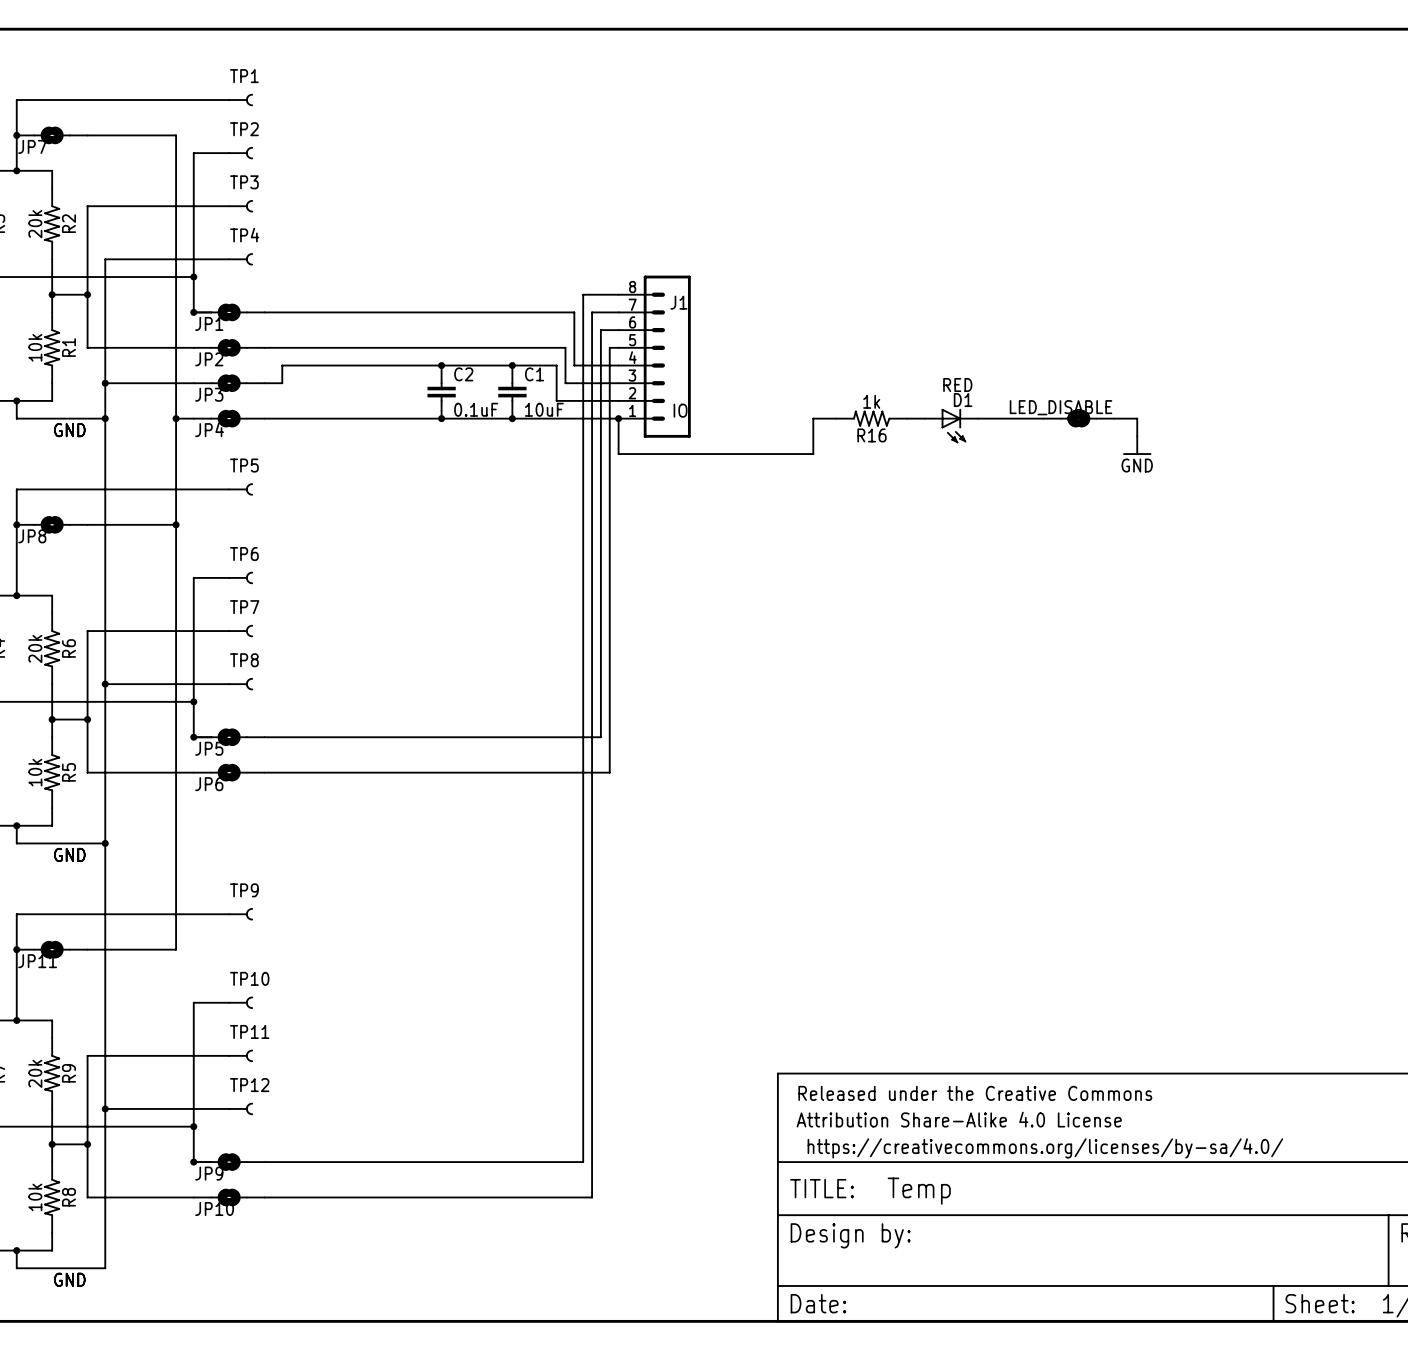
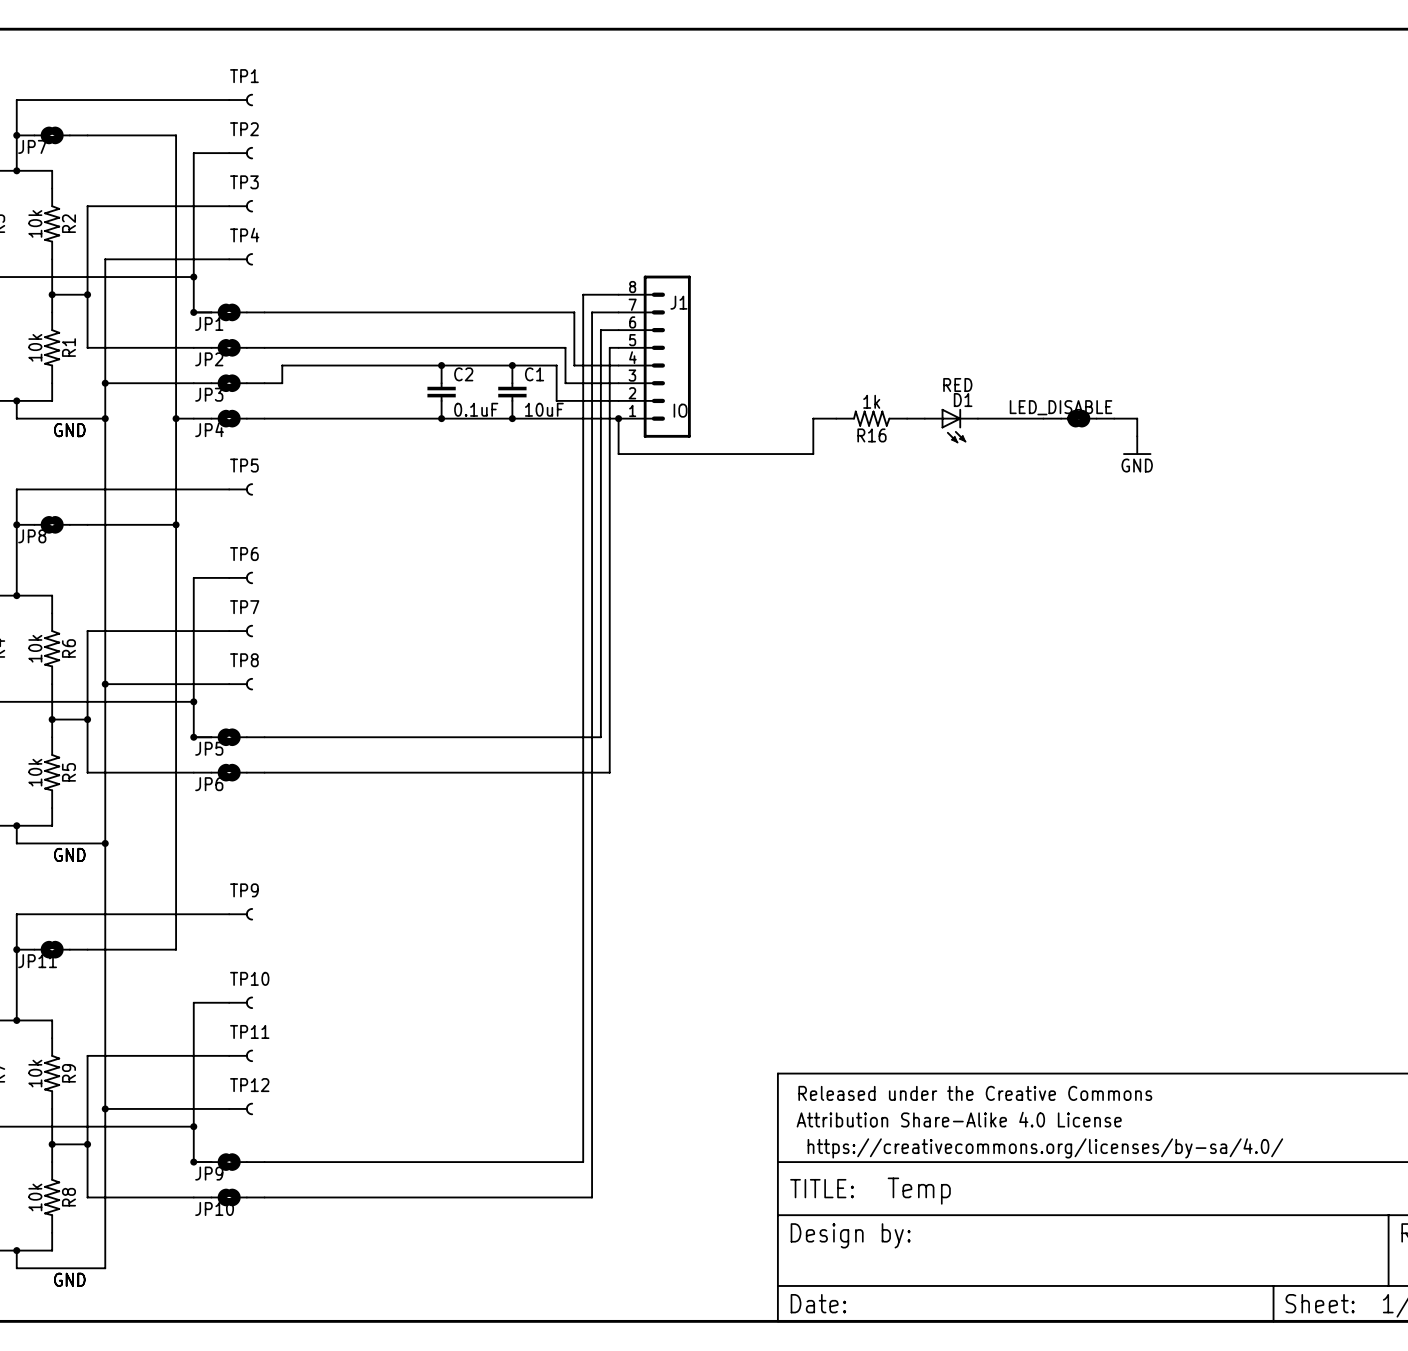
R2 value: 20k (35, 224) -> 10k (35, 223)
R6 value: 20k (35, 649) -> 10k (35, 648)
R9 value: 20k (35, 1073) -> 10k (35, 1073)

